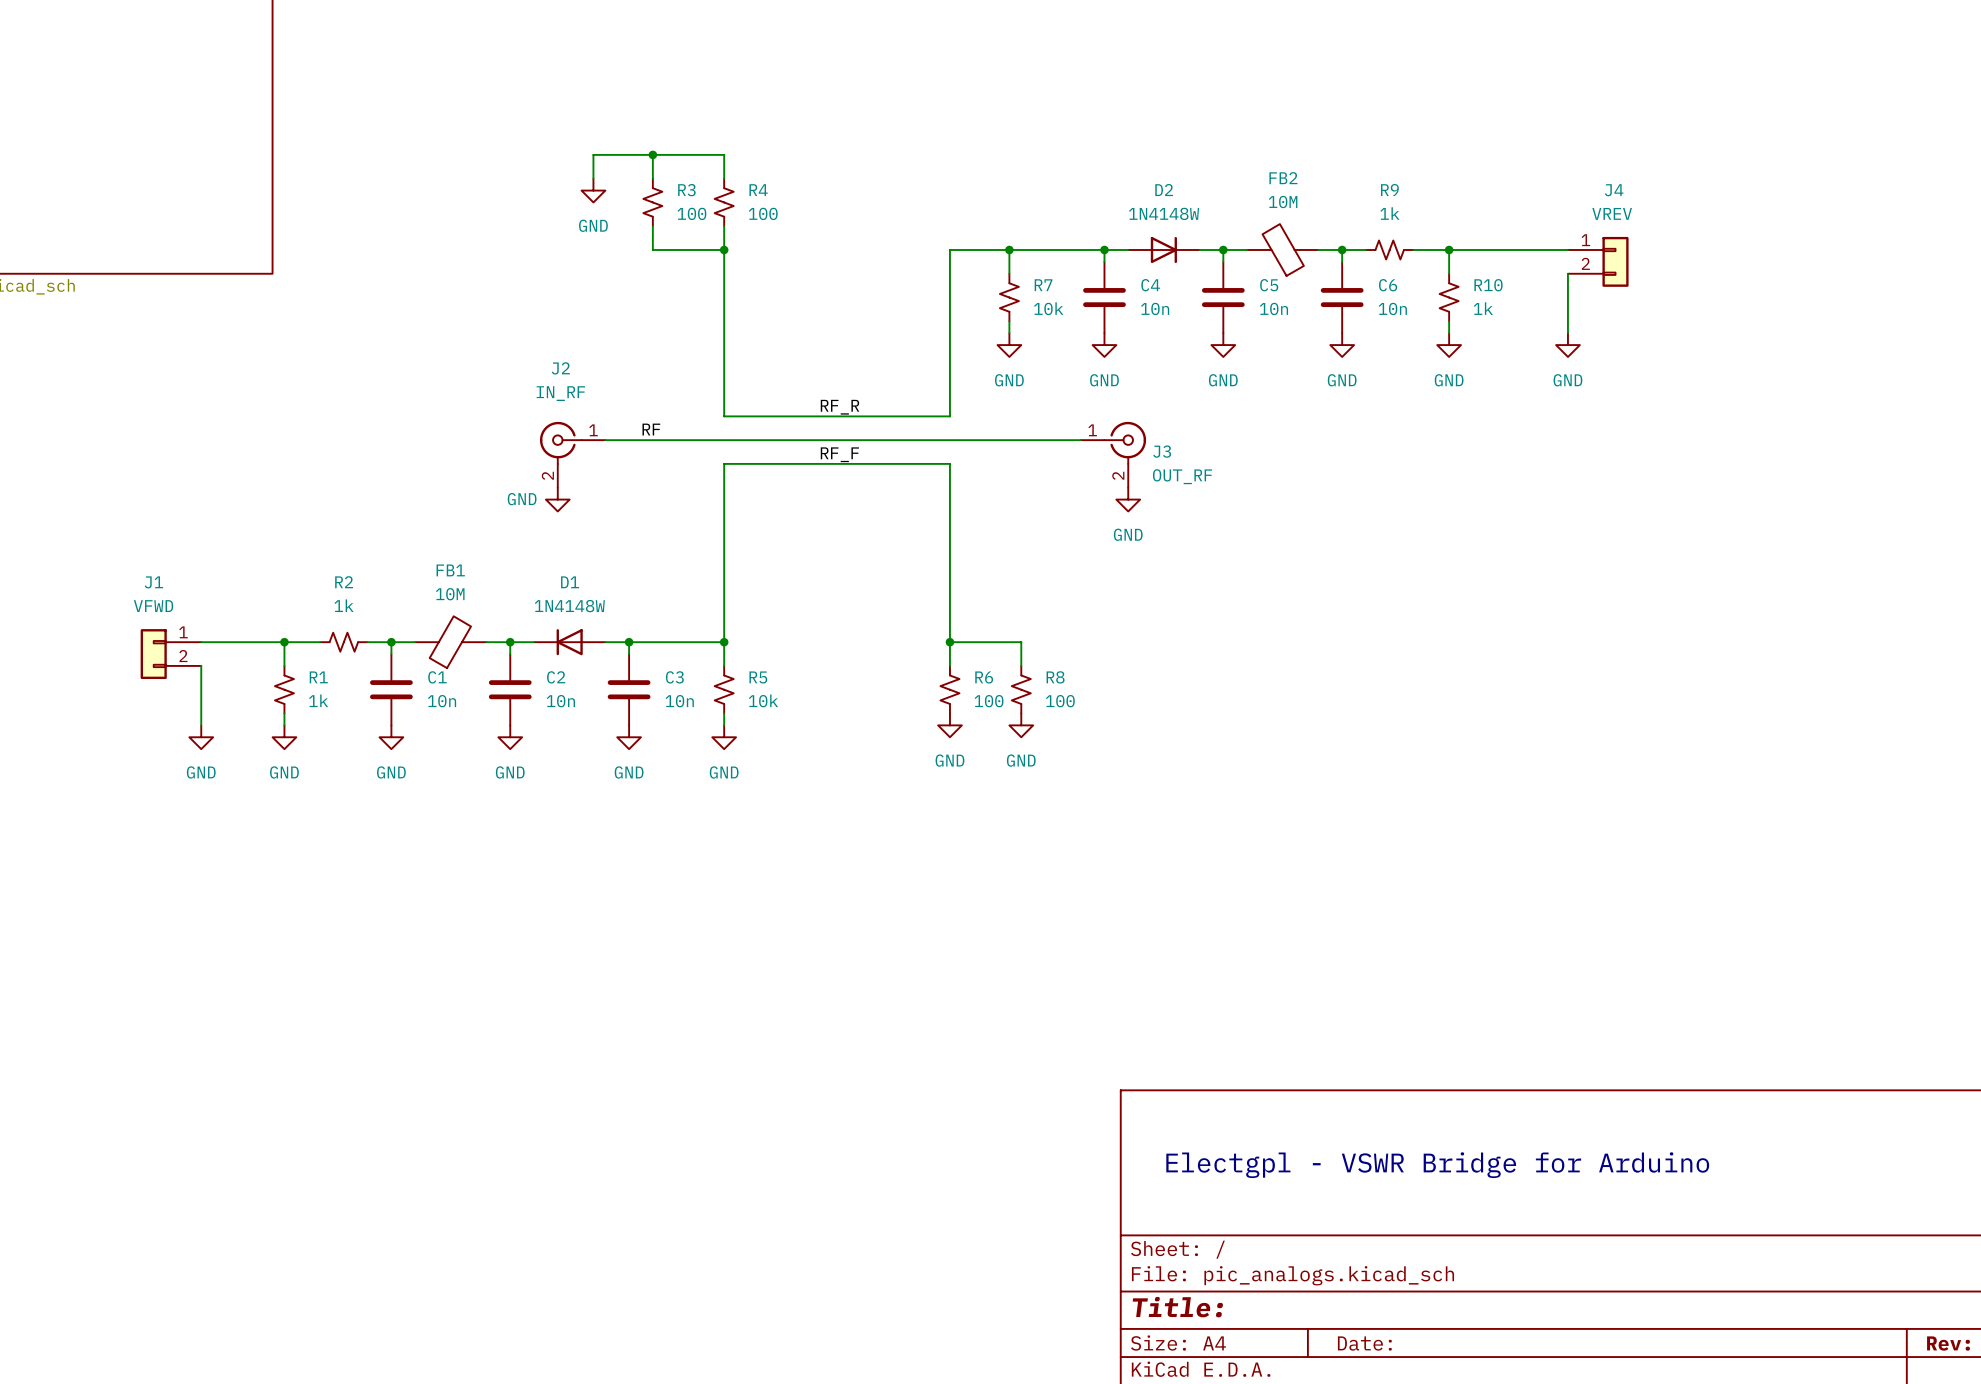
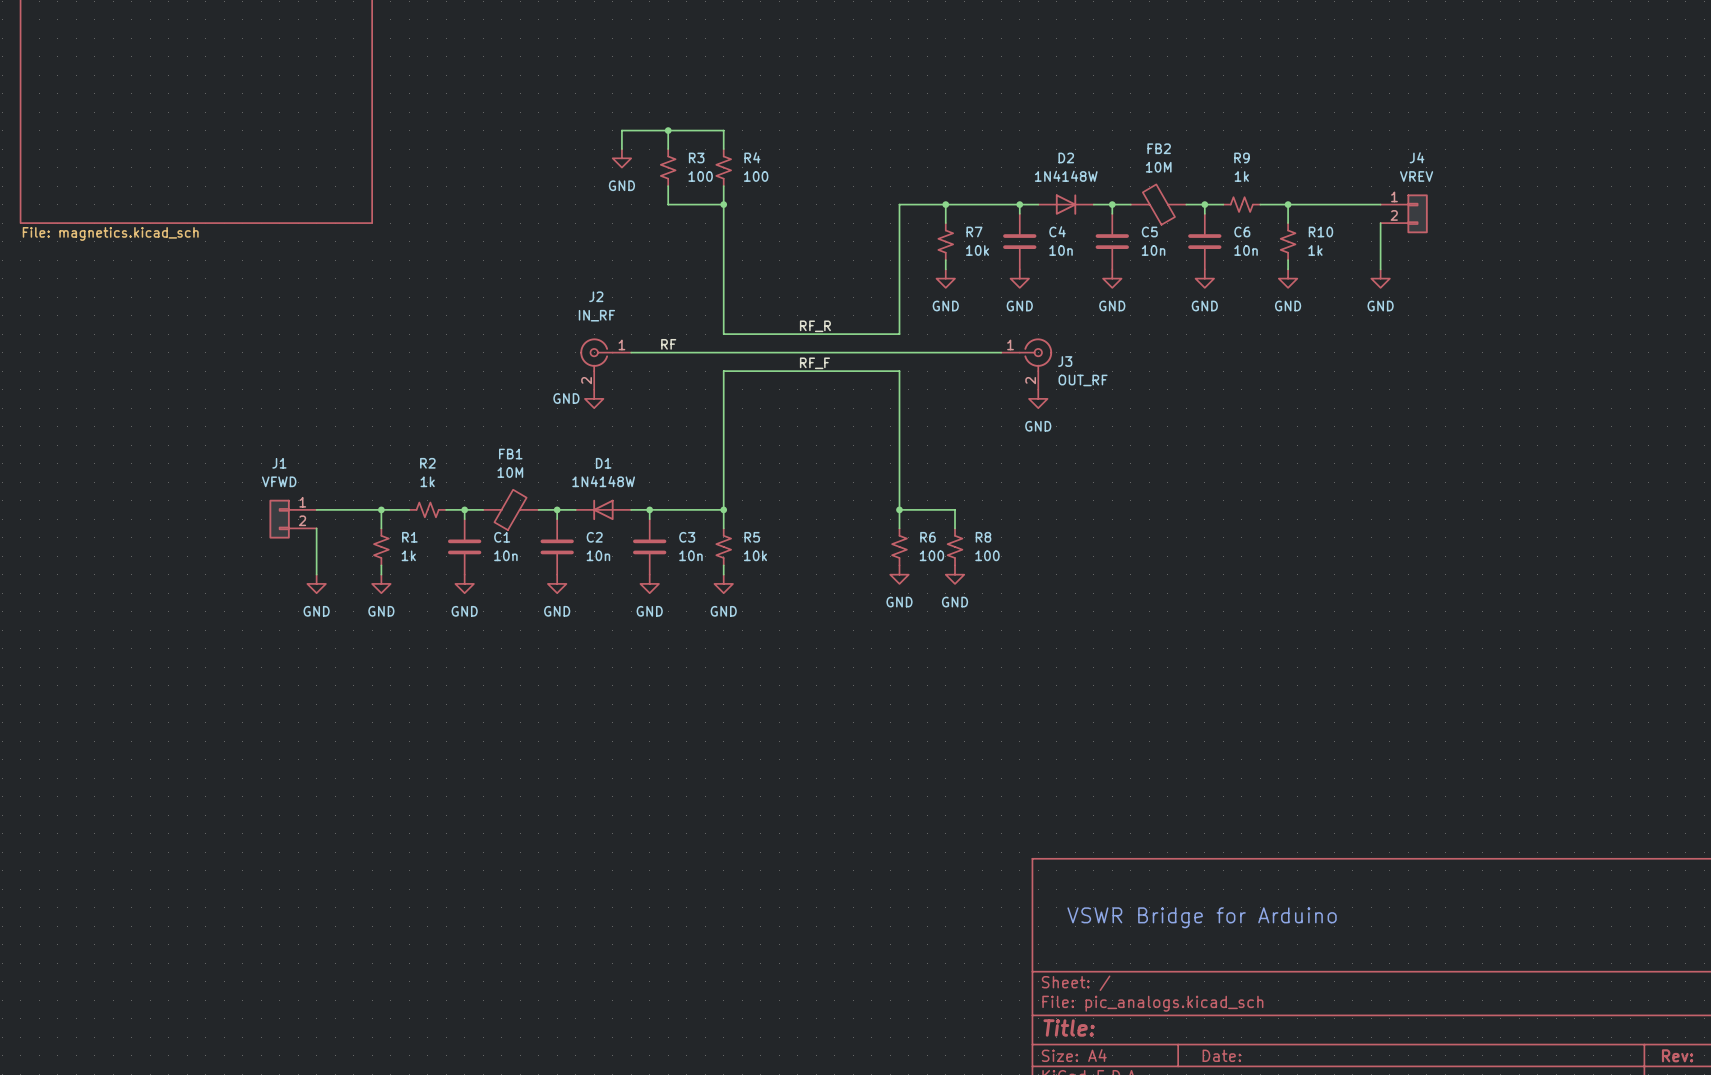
text: Electgpl - VSWR Bridge for Arduino (1437, 1165) -> VSWR Bridge for Arduino (1202, 917)

